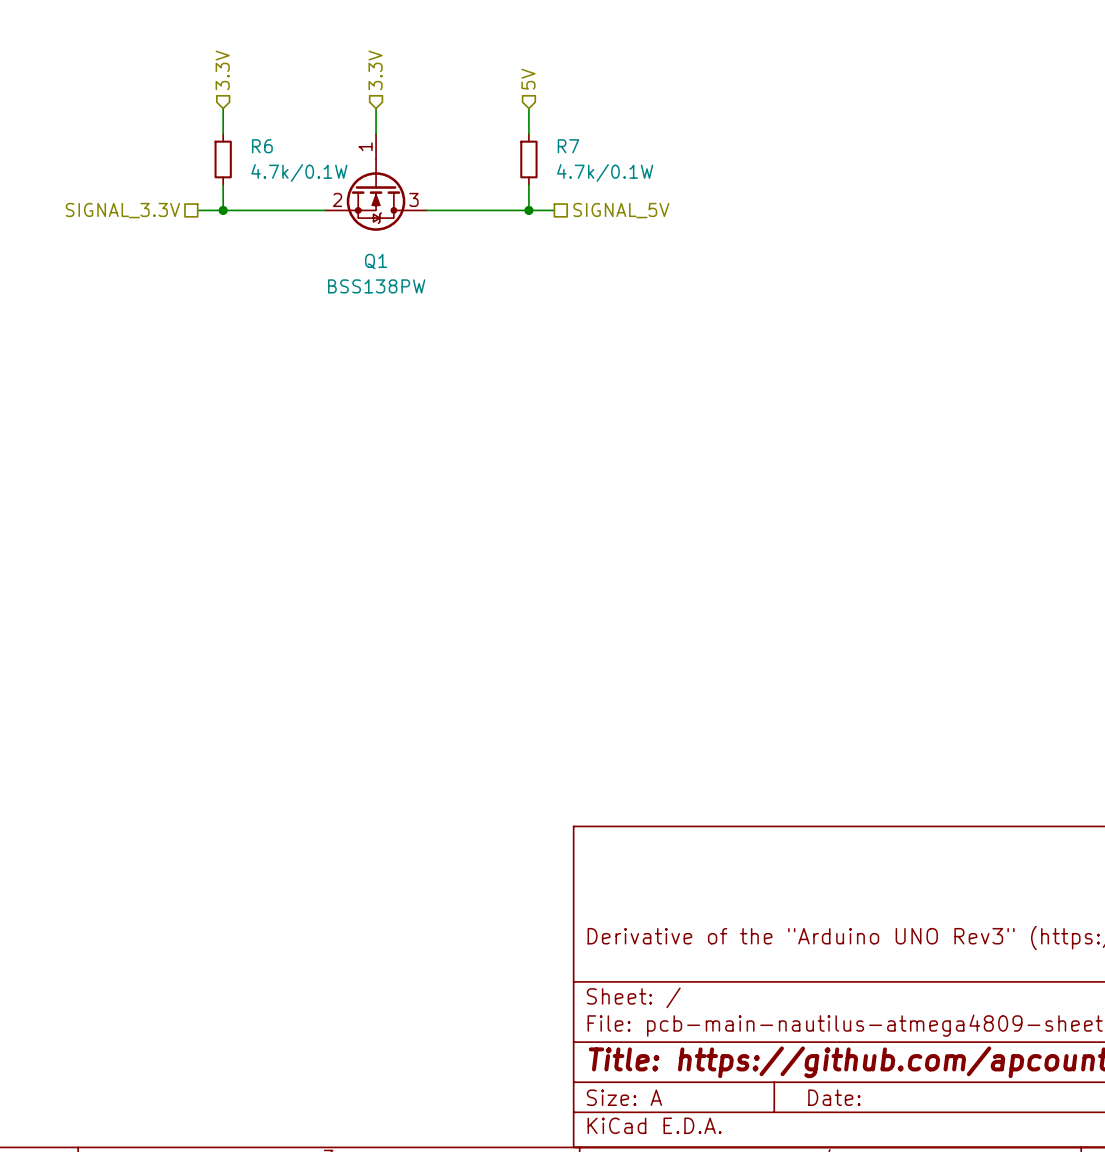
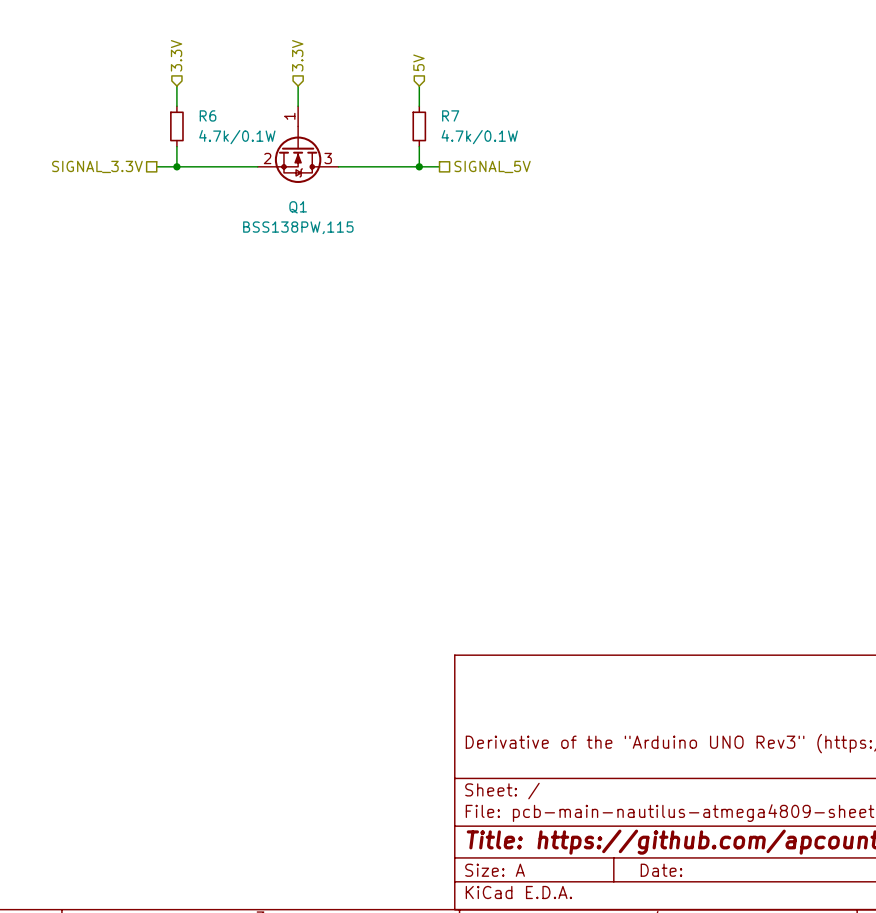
Q1 value: BSS138PW (376, 286) -> BSS138PW,115 (298, 227)

